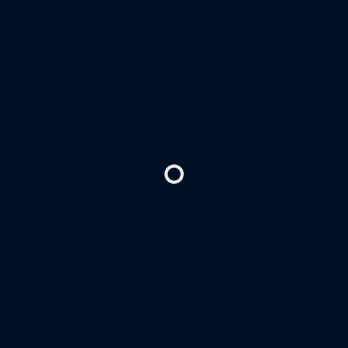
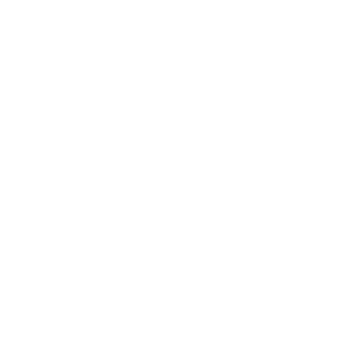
via: (174, 174) -> none

